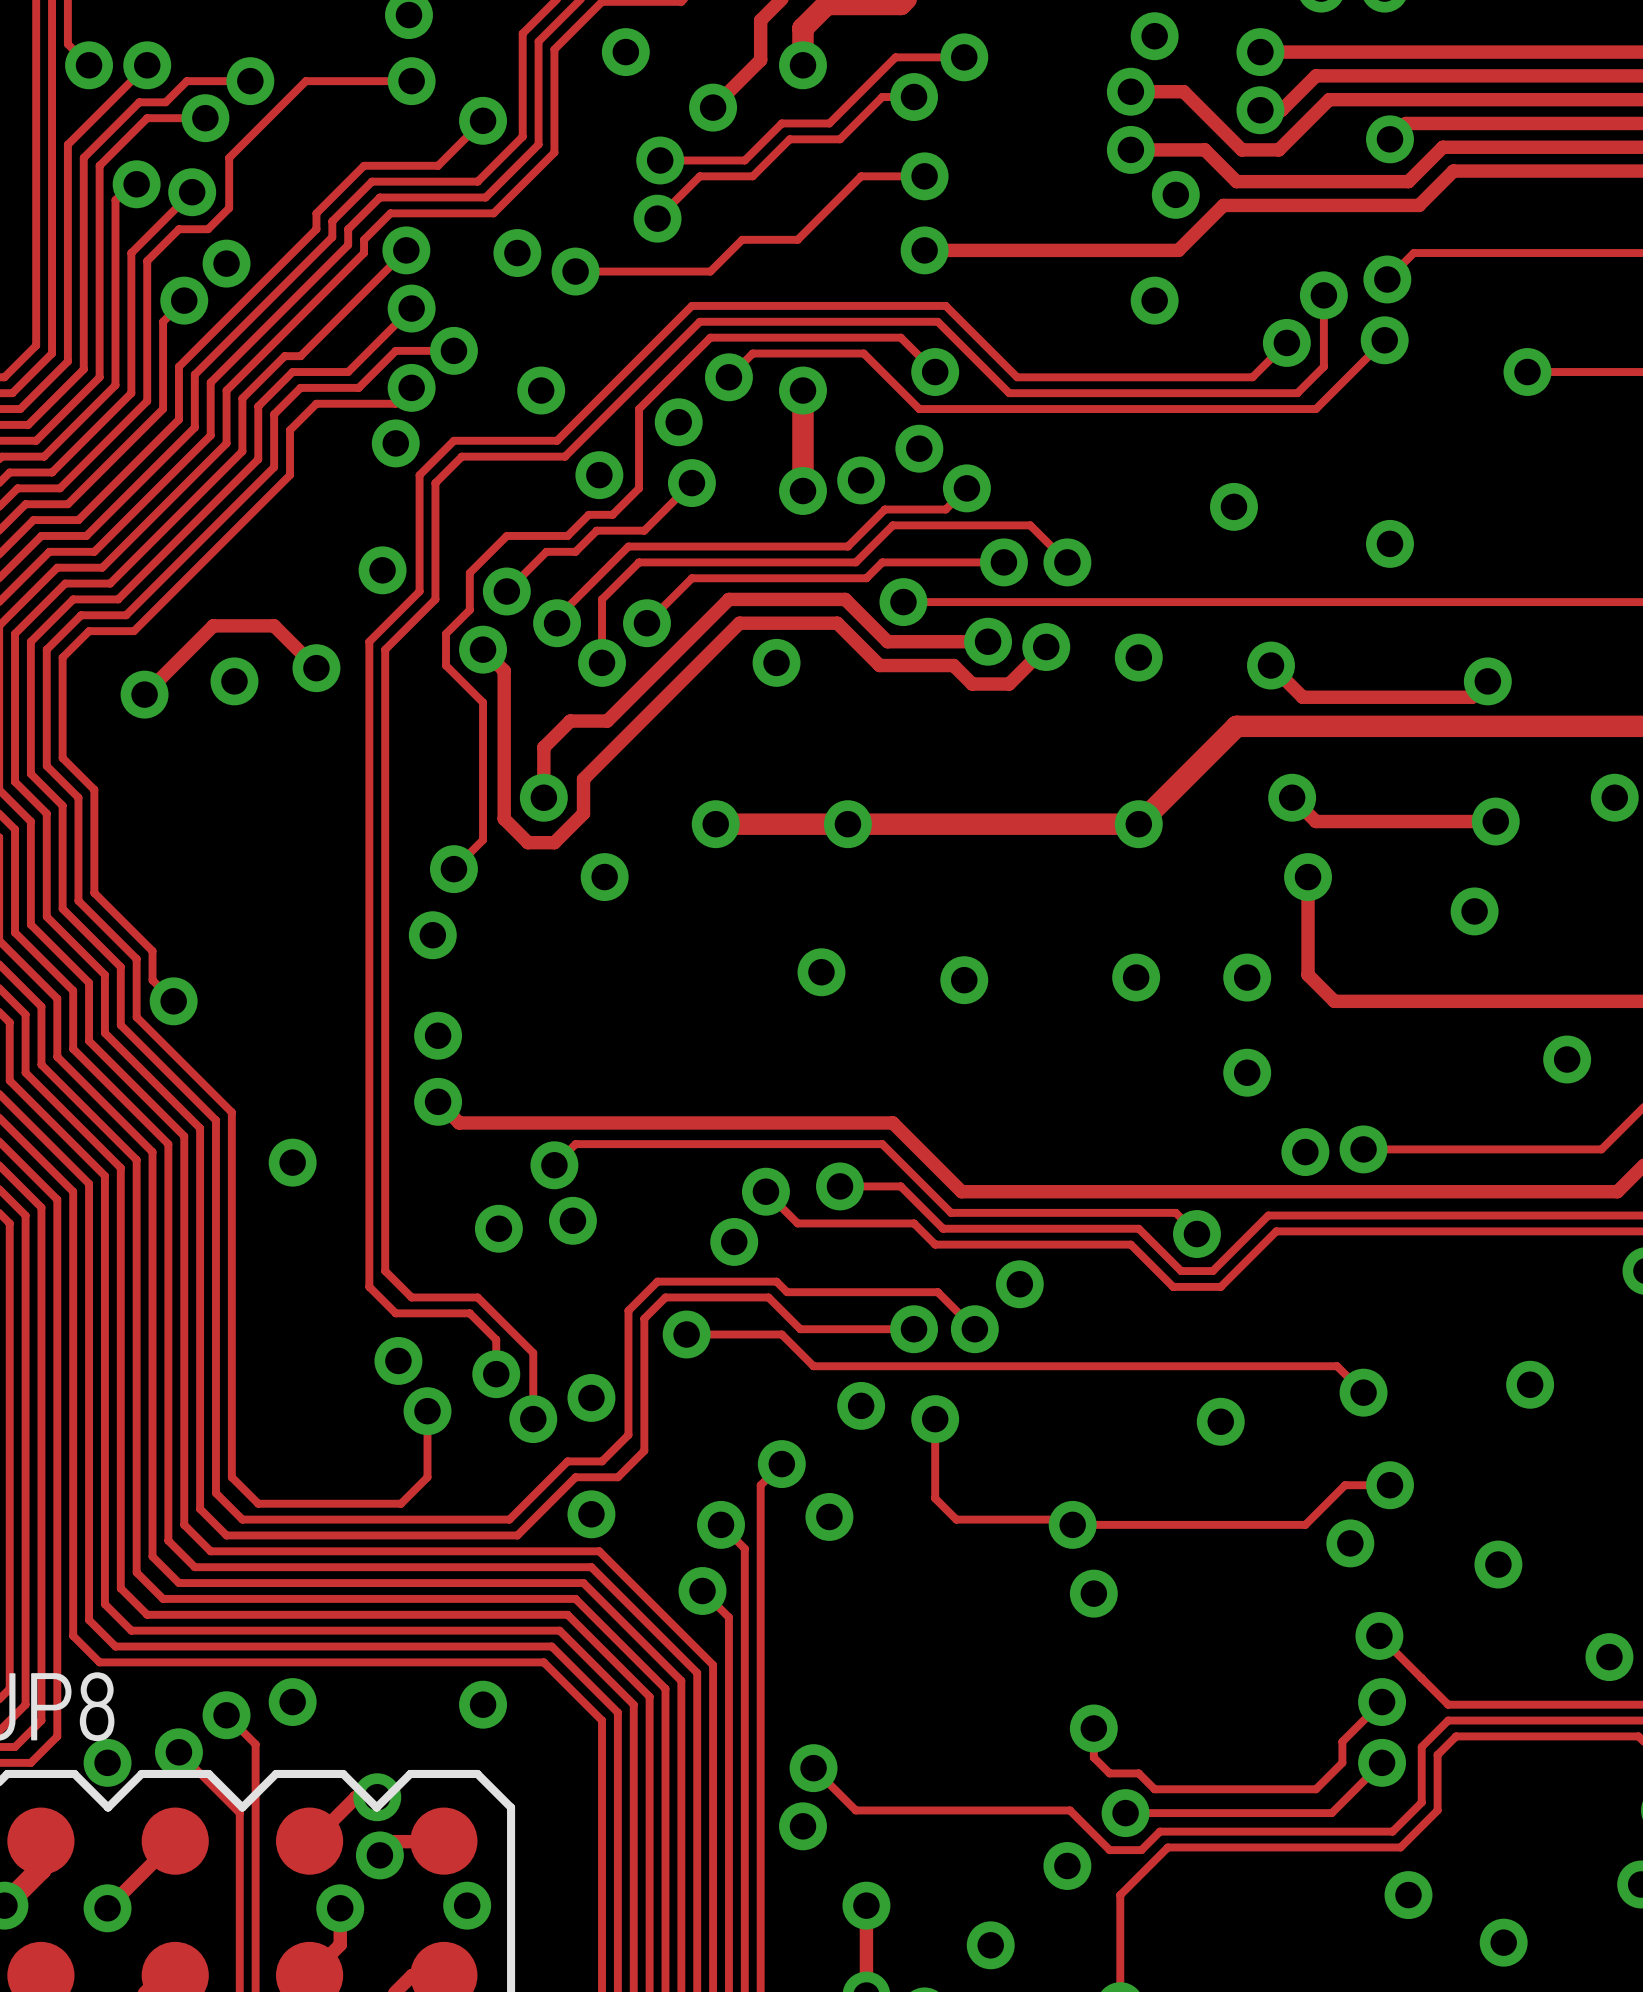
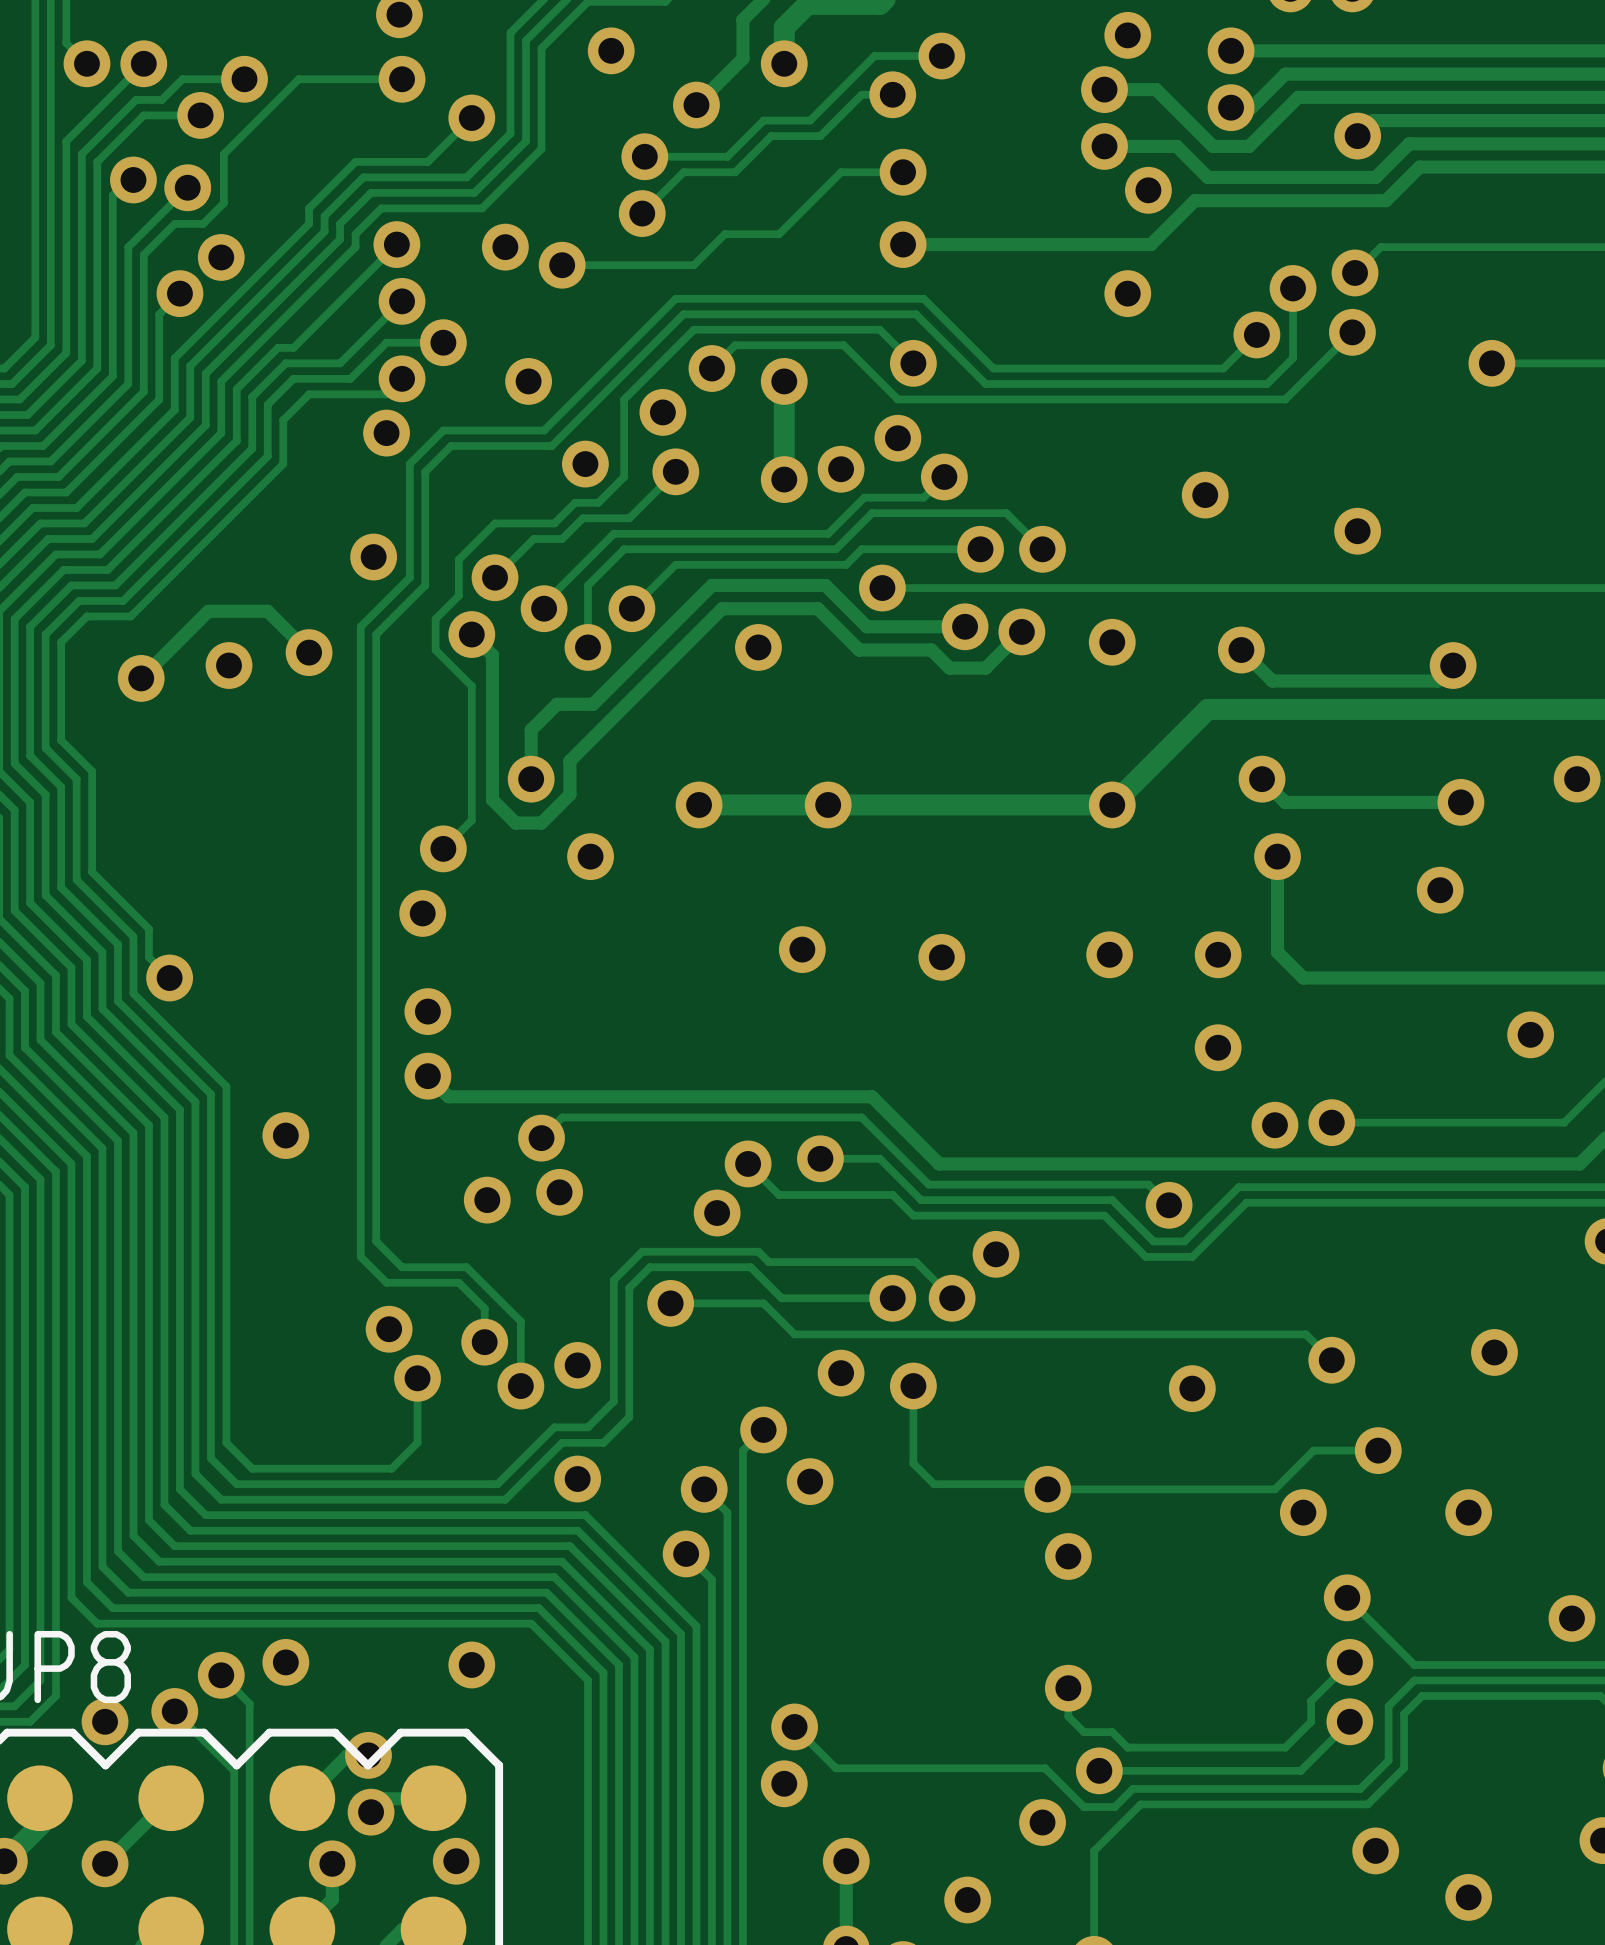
via position: (1389, 1485) -> (1378, 1450)
via position: (1350, 1543) -> (1303, 1512)
via position: (1498, 1564) -> (1468, 1512)

